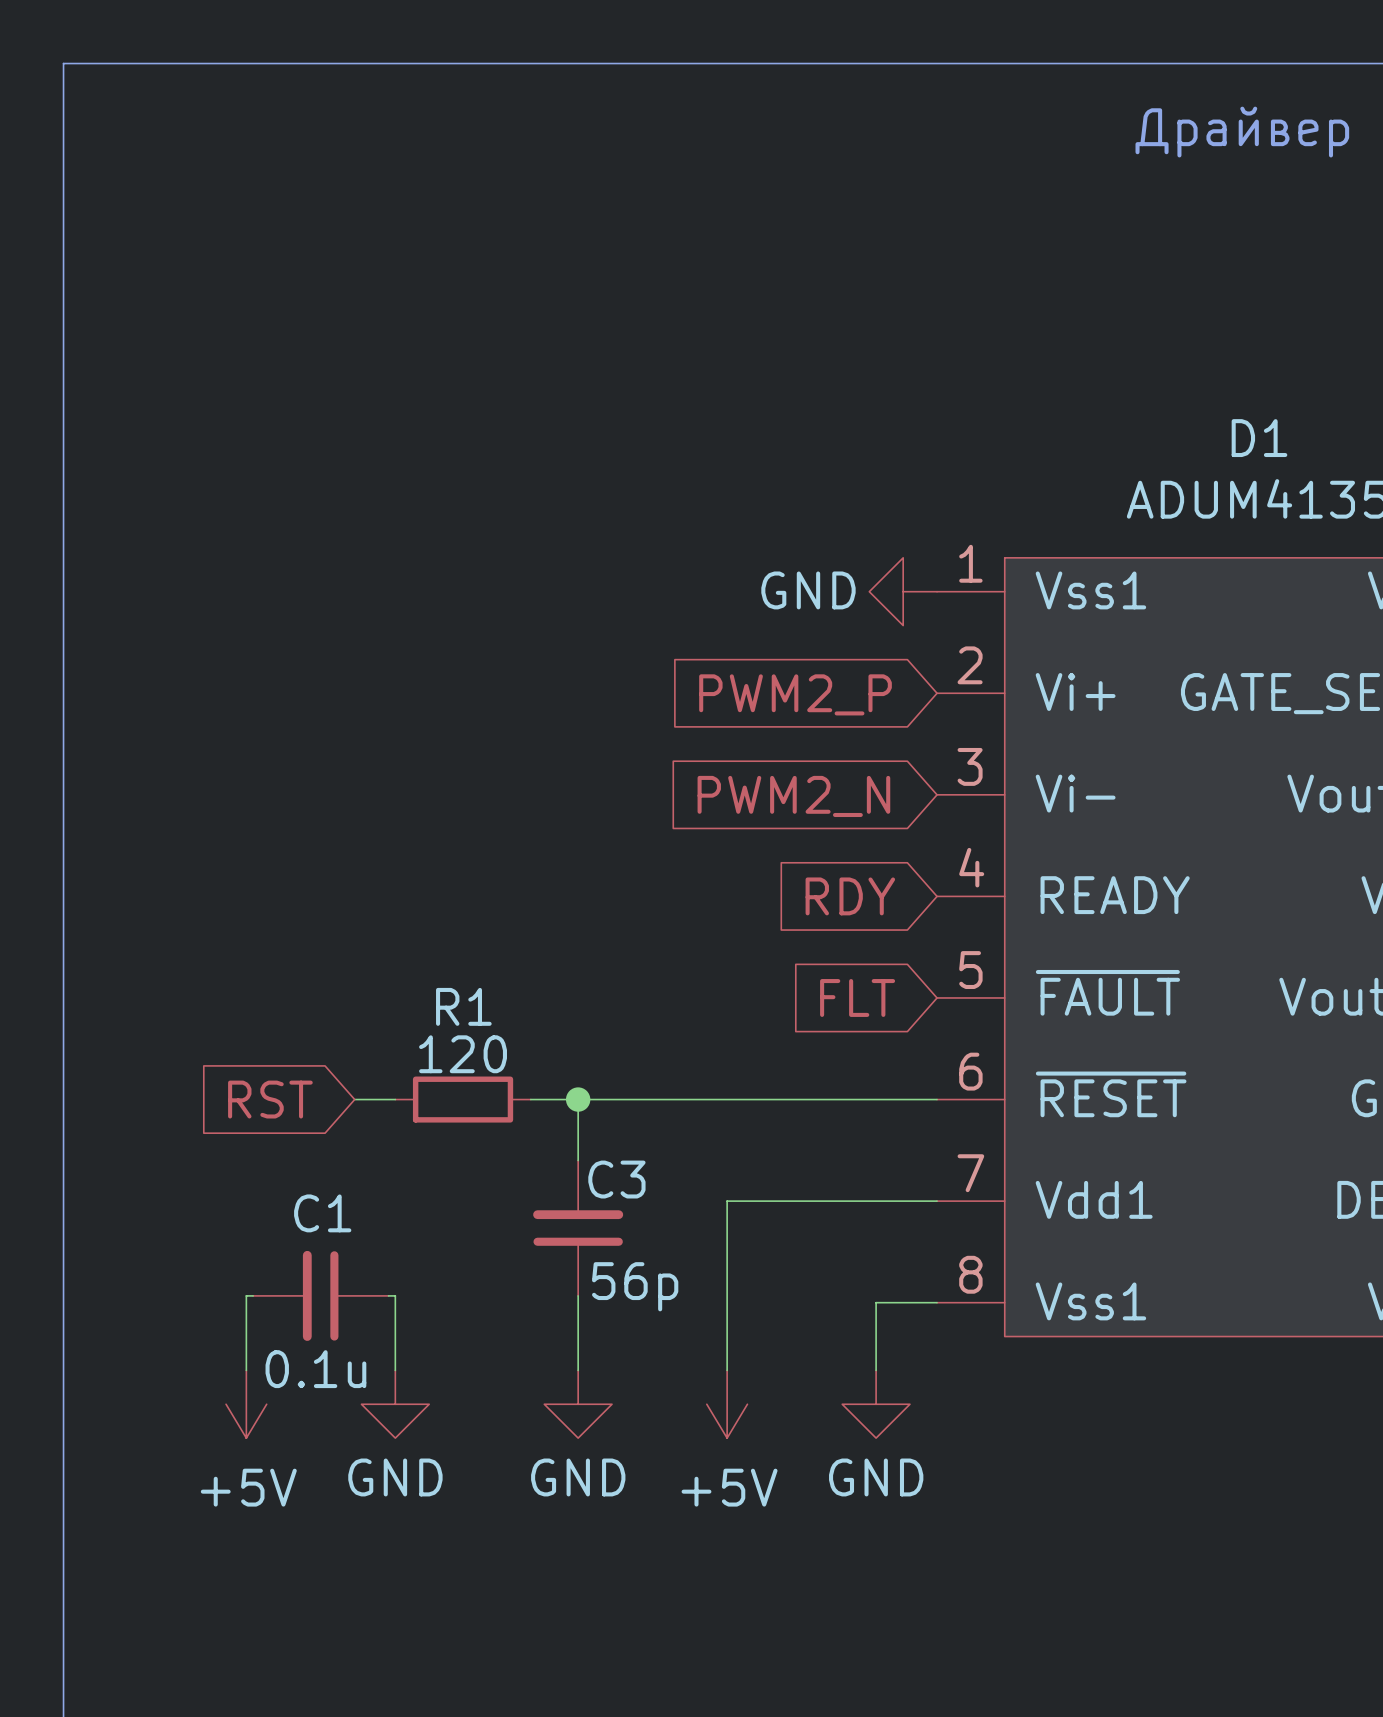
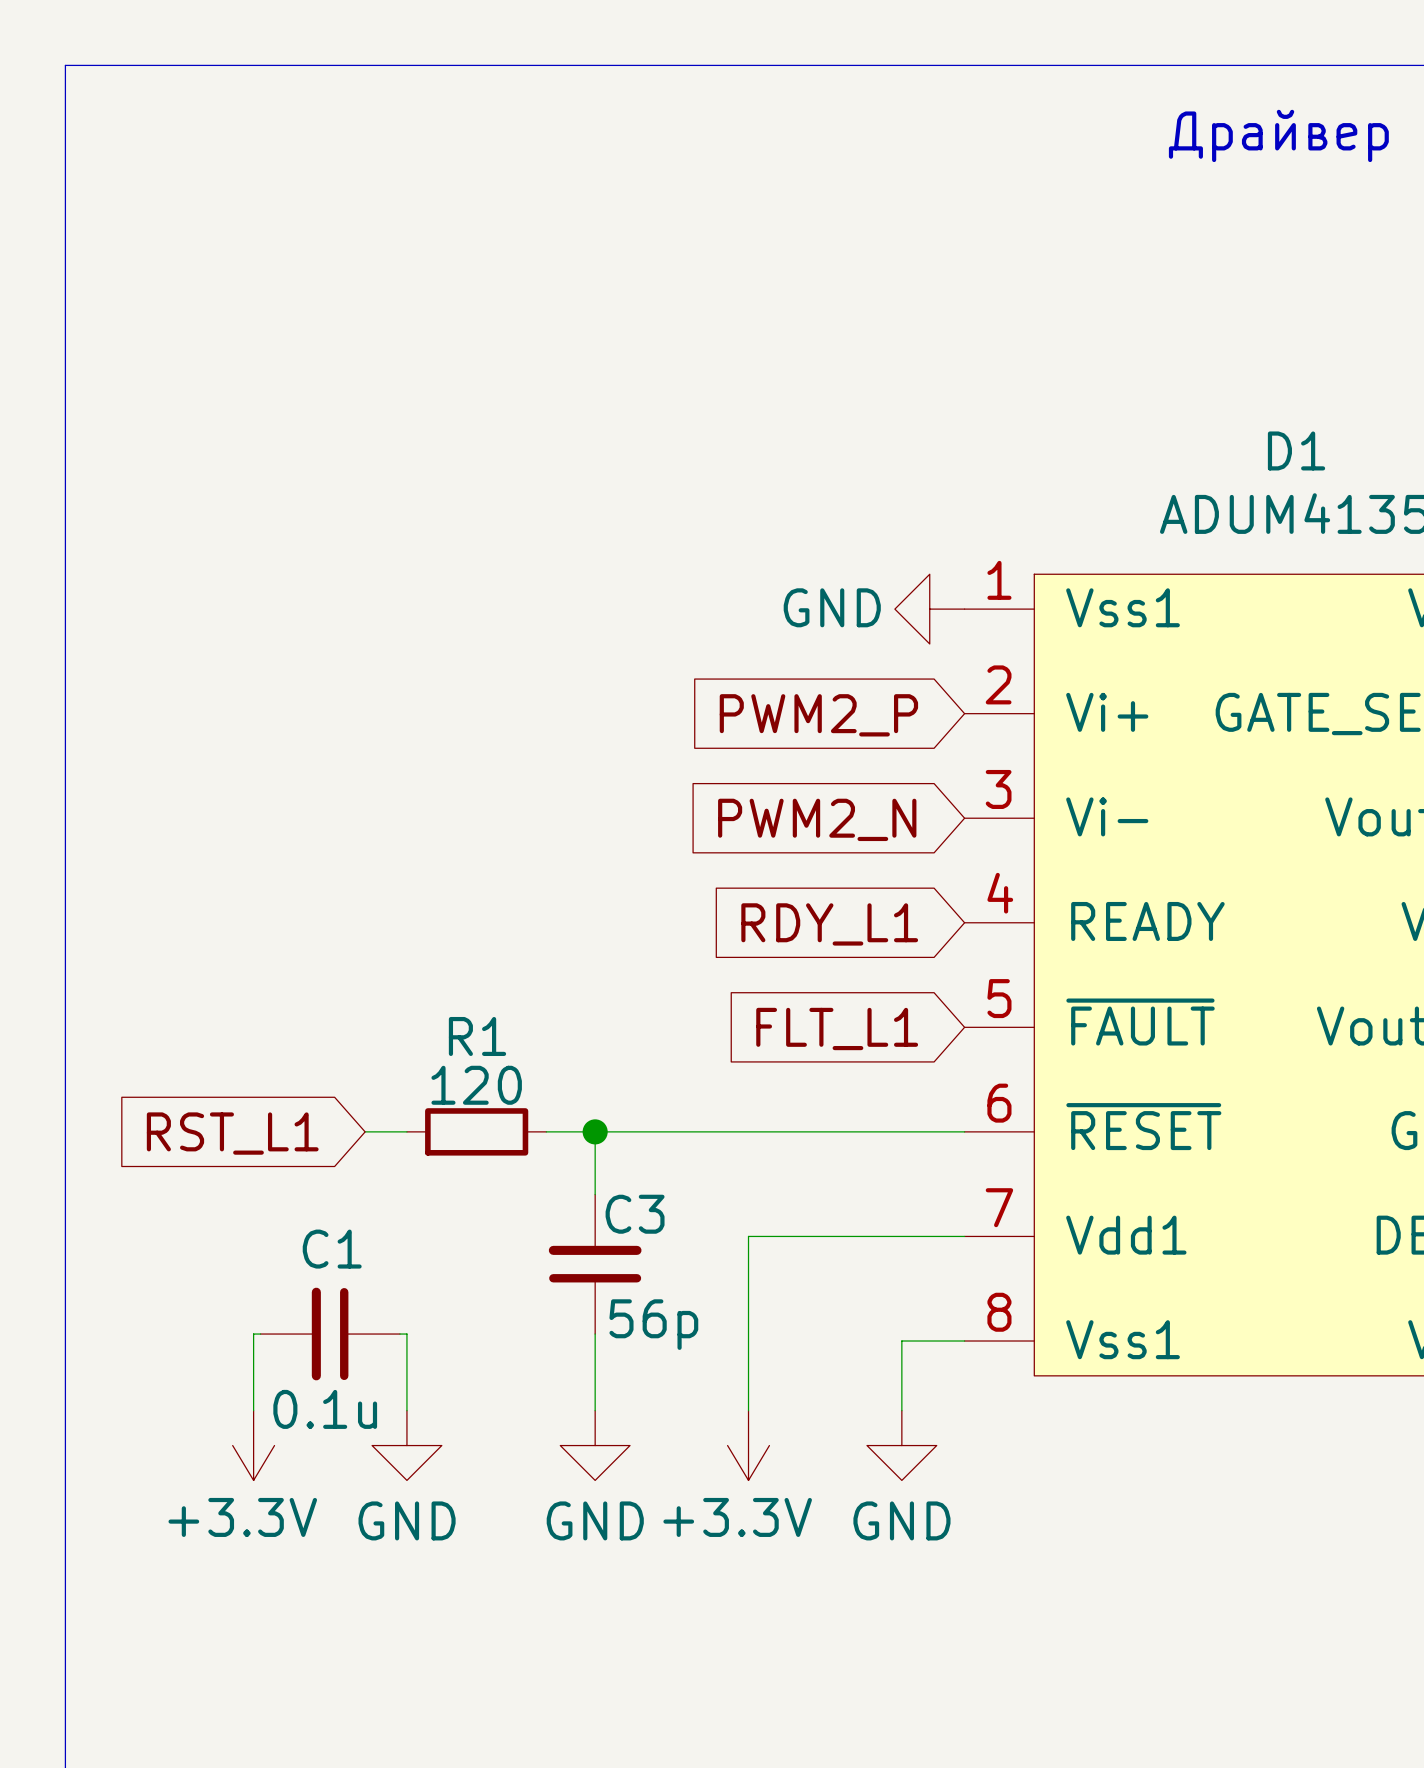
global label: RDY (850, 896) -> RDY_L1 (829, 924)
global label: FLT (857, 997) -> FLT_L1 (837, 1028)
global label: RST (270, 1099) -> RST_L1 (232, 1133)
power symbol: +5V (246, 1404) -> +3.3V (253, 1445)
power symbol: +5V (727, 1404) -> +3.3V (748, 1445)

